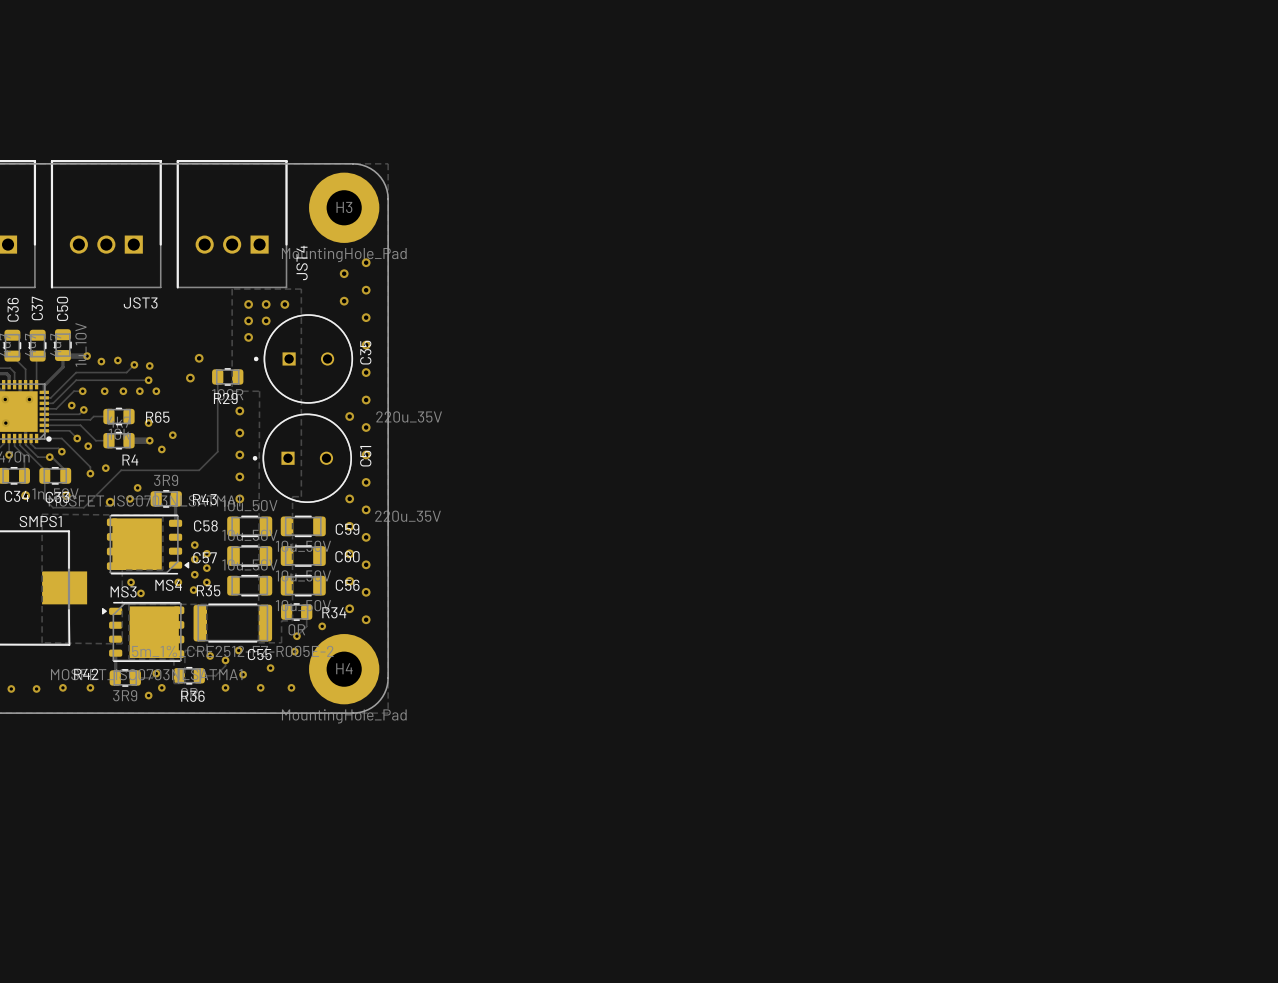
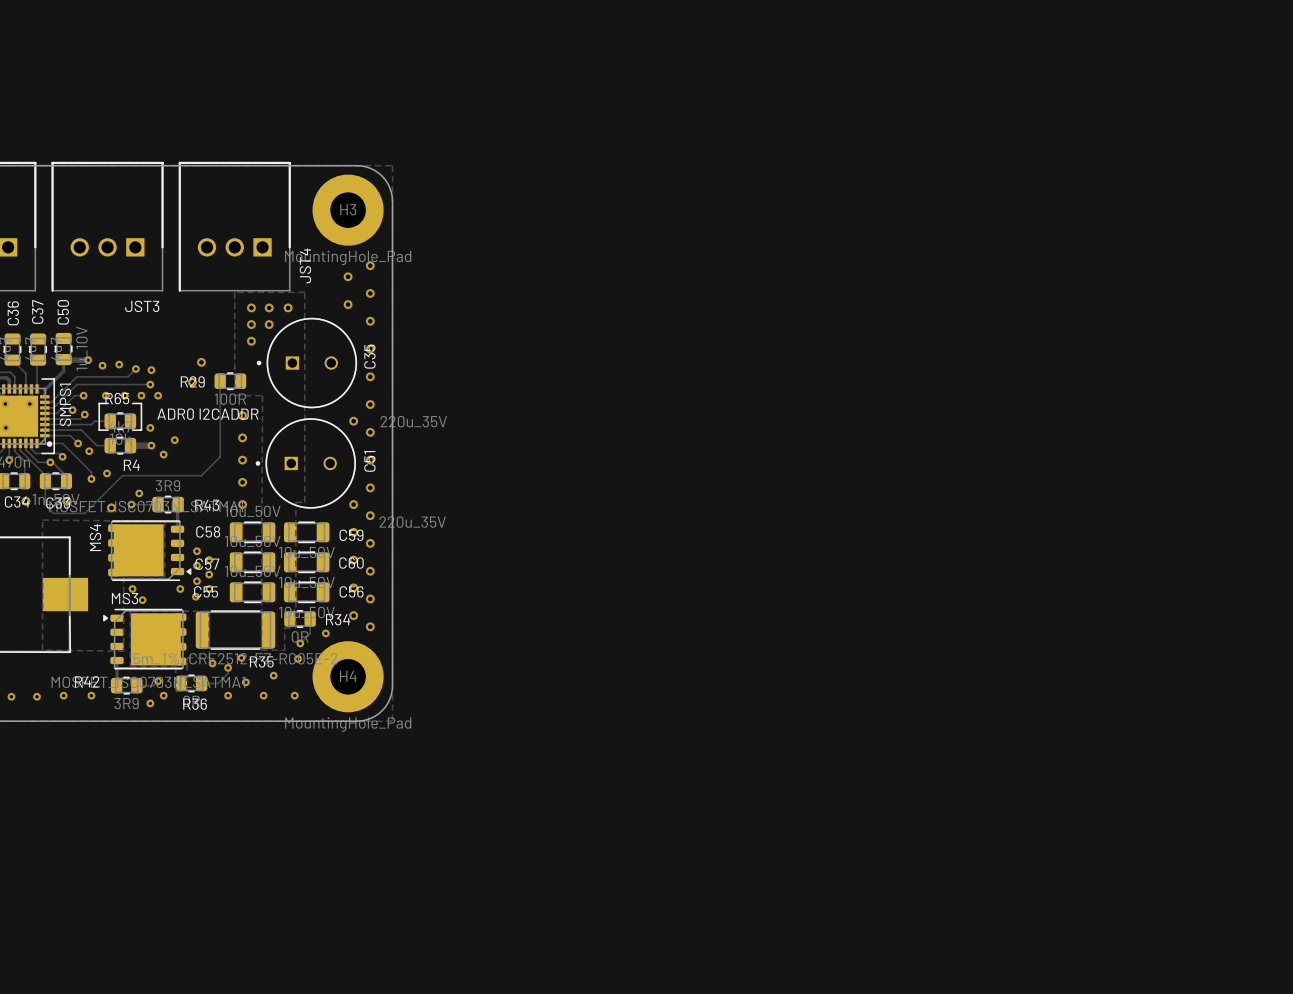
line: none -> (42, 379) (54, 379) (54, 453) (42, 453)
line: none -> (108, 403) (99, 403) (99, 430) (108, 430)
line: none -> (132, 403) (141, 403) (141, 430) (132, 430)
R29 name position: R29 (225, 398) -> R29 (192, 381)
text: none -> ADR0 I2CADDR (207, 414)
R65 name position: R65 (157, 417) -> R65 (117, 398)
SMPS1 name rotation: 0° (40, 521) -> 90° counterclockwise (65, 404)
SMPS1 name position: SMPS1 (40, 521) -> SMPS1 (65, 404)
MS4 name rotation: 0° (168, 585) -> 90° counterclockwise (95, 537)
MS4 name position: MS4 (168, 585) -> MS4 (95, 537)
R35 name position: R35 (208, 590) -> R35 (261, 661)
C55 name position: C55 (259, 654) -> C55 (206, 591)

